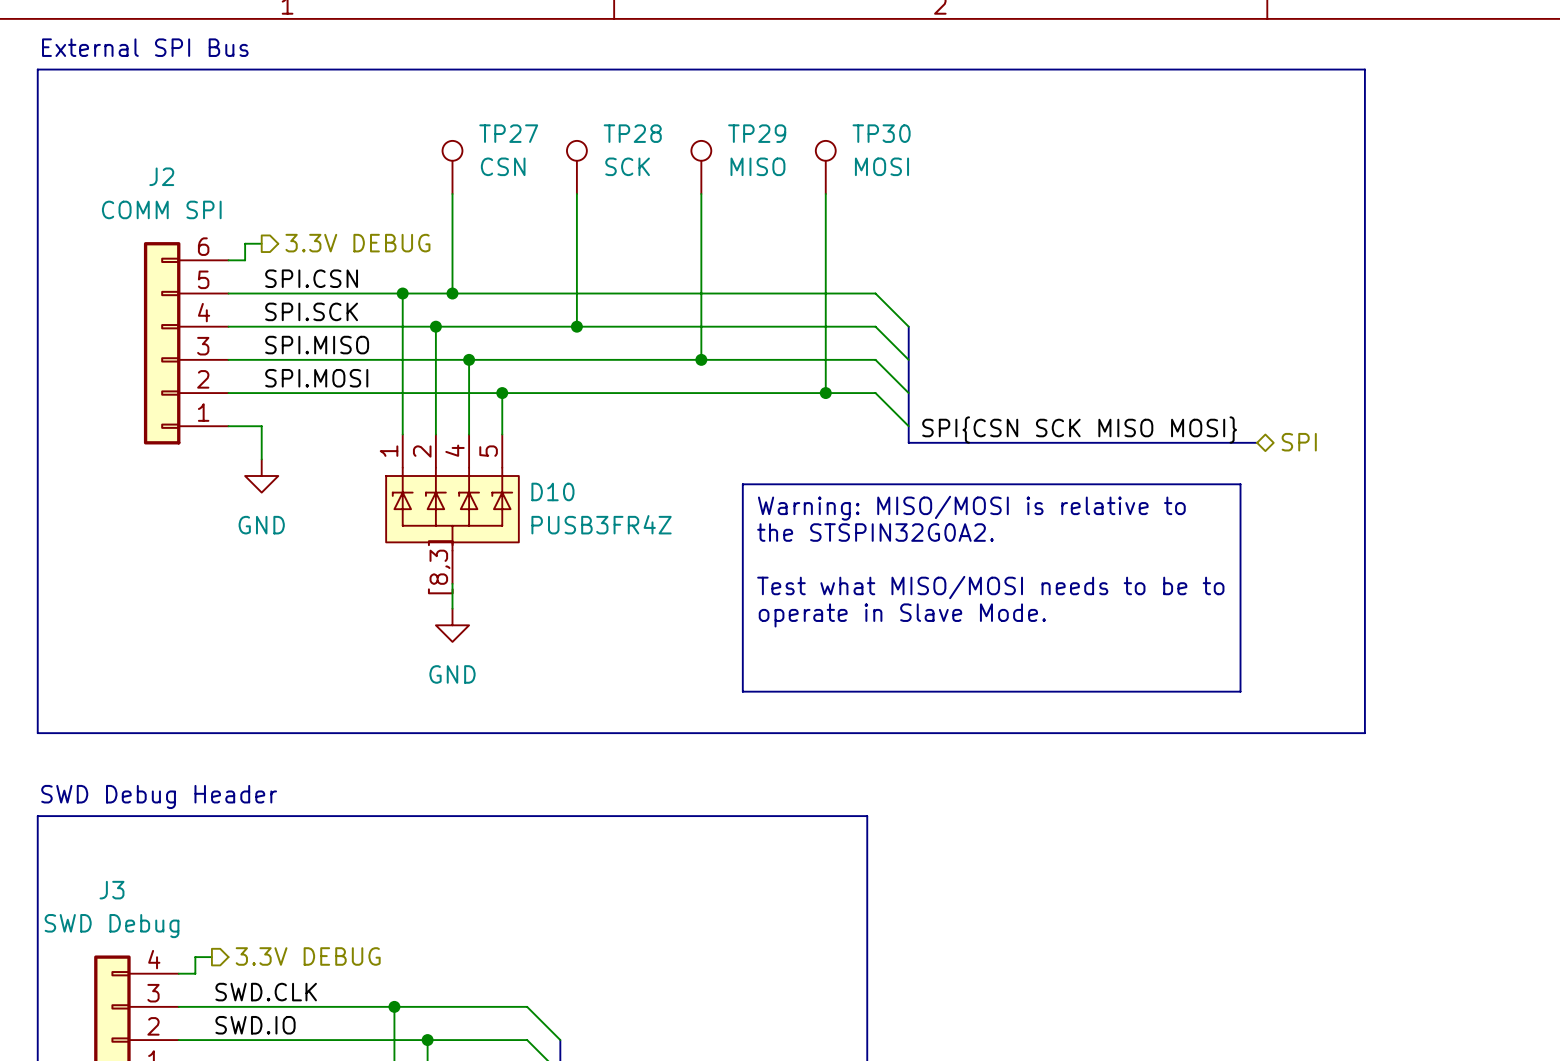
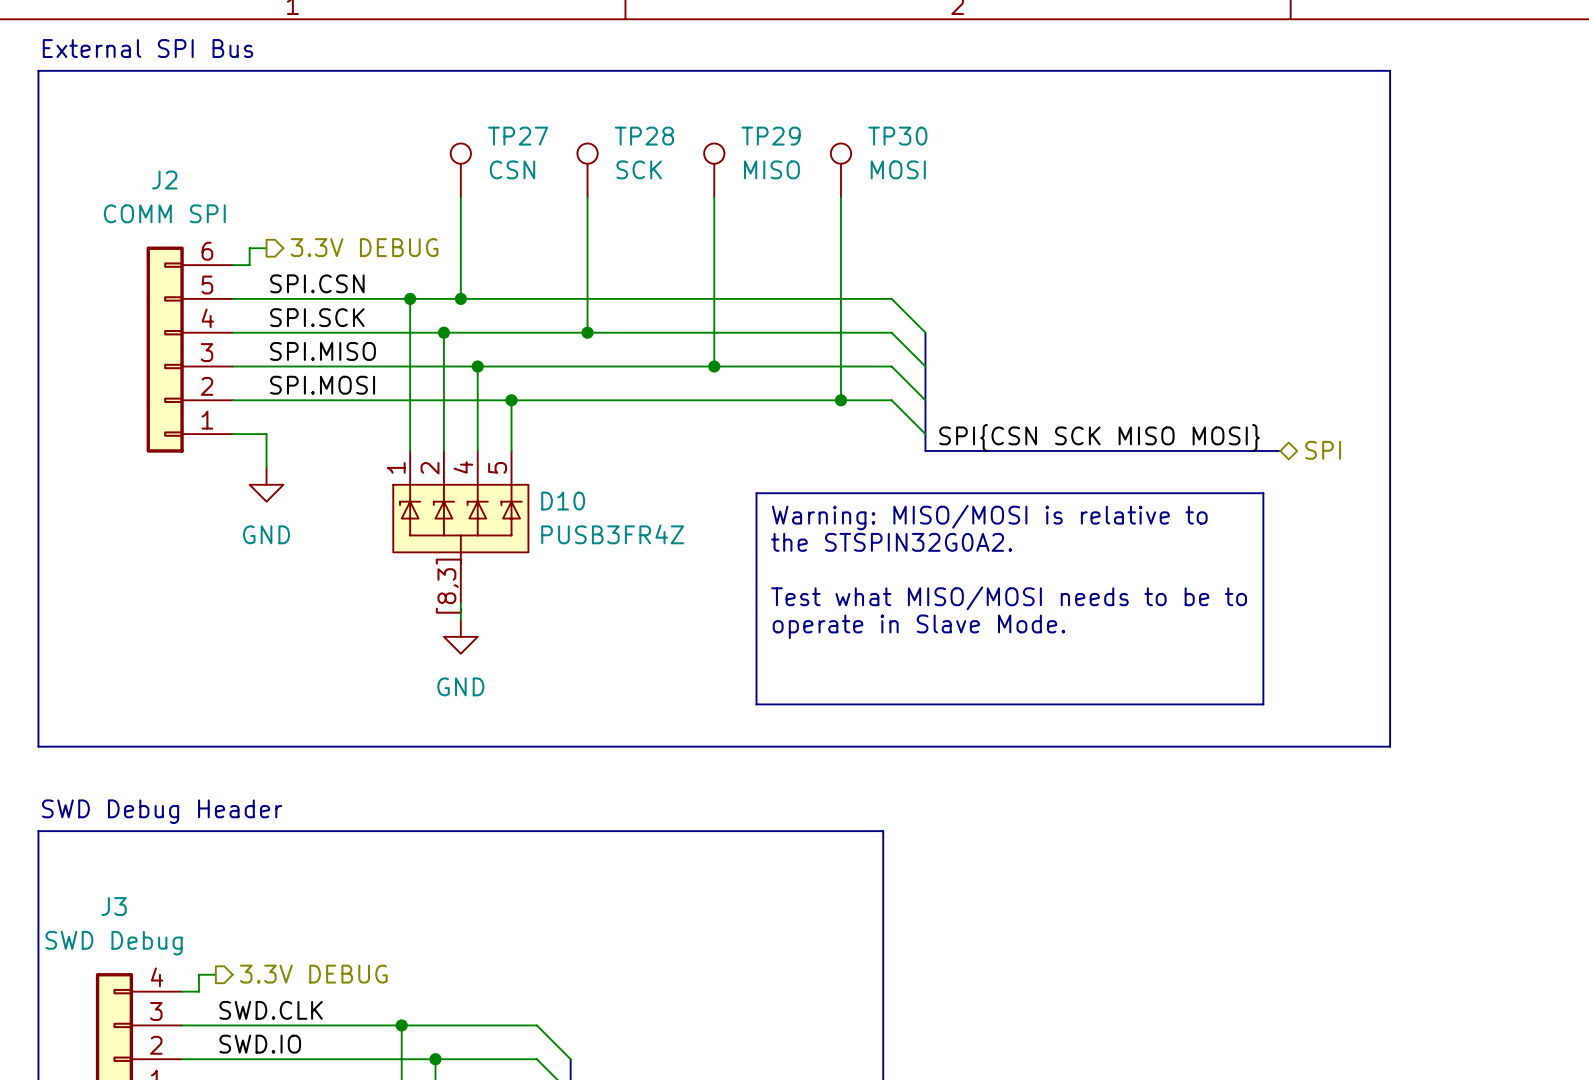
D10 symbol: [386, 434, 519, 584] -> [393, 450, 529, 604]

